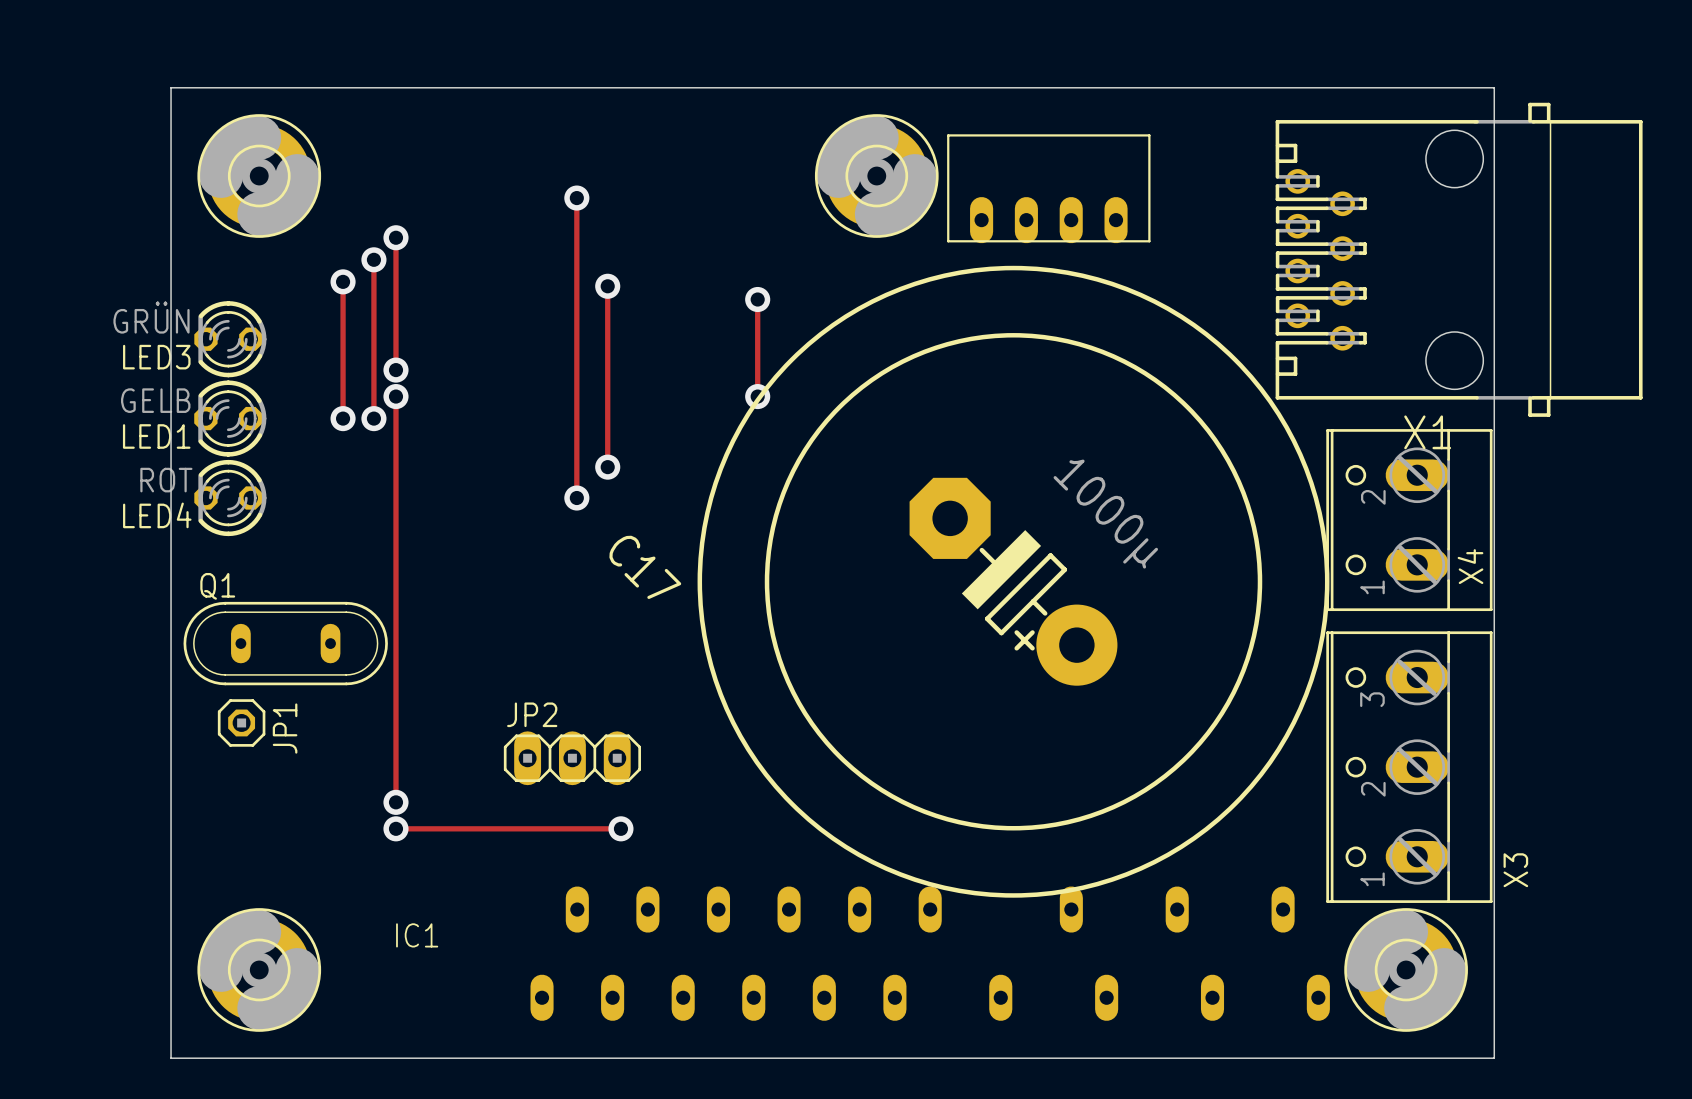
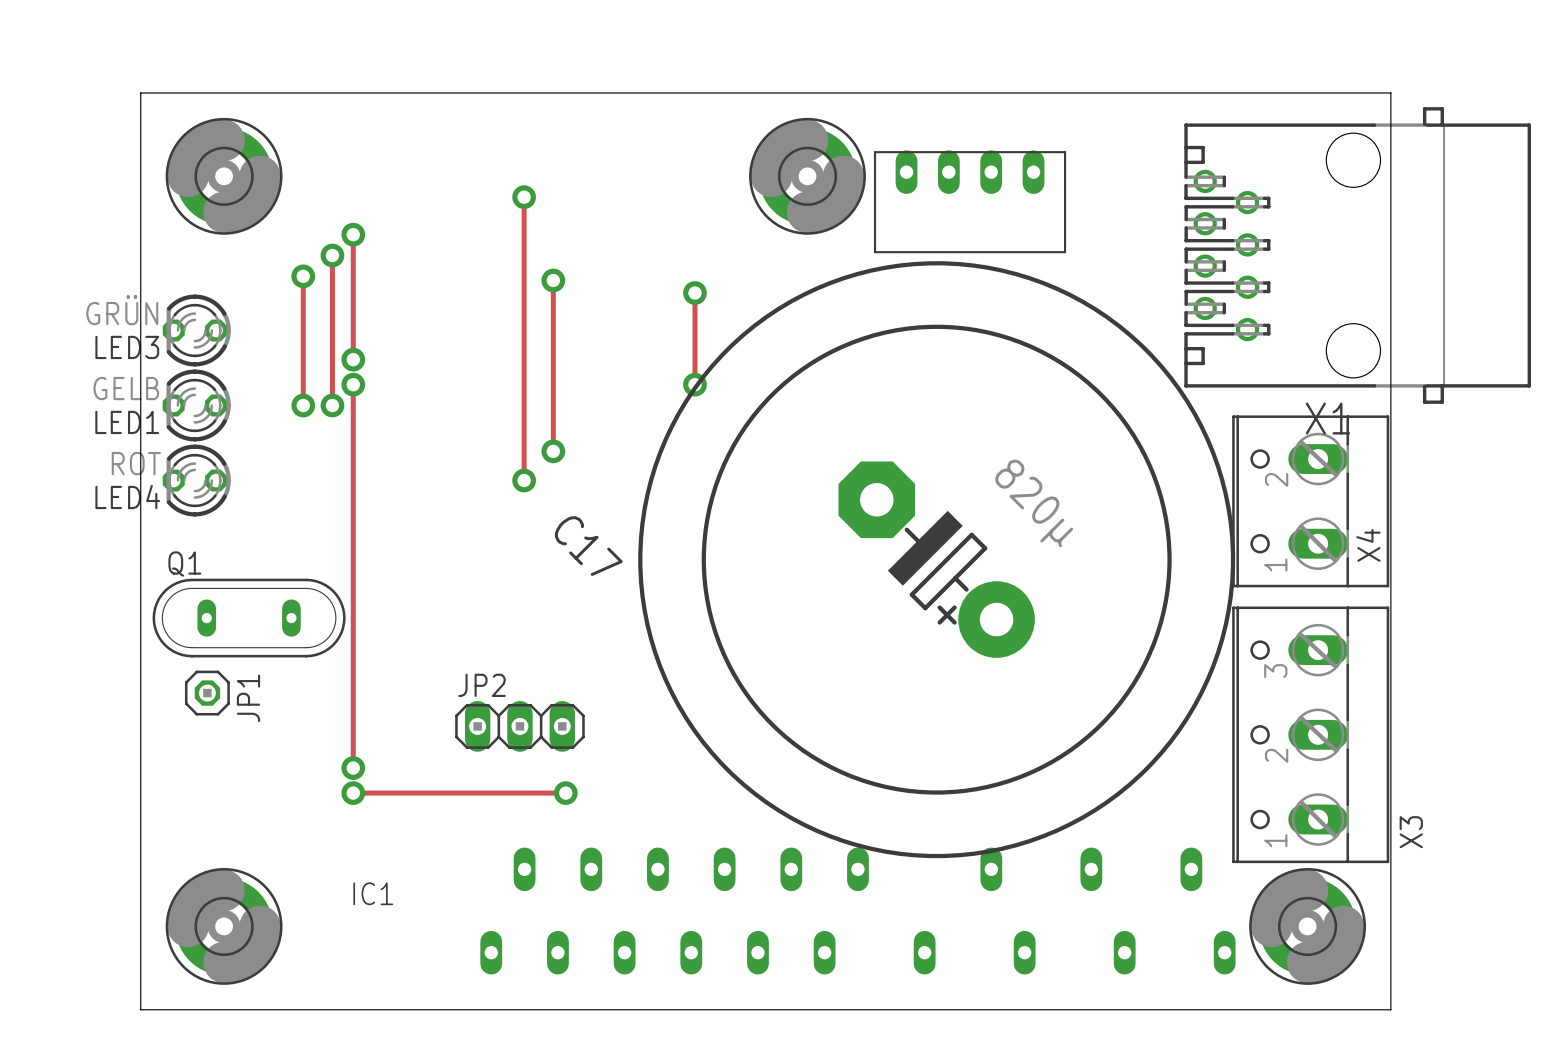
part rotation: 0° (1048, 188) -> 180° (970, 201)
C17 value: 1000µ (1105, 514) -> 820µ (1034, 503)

